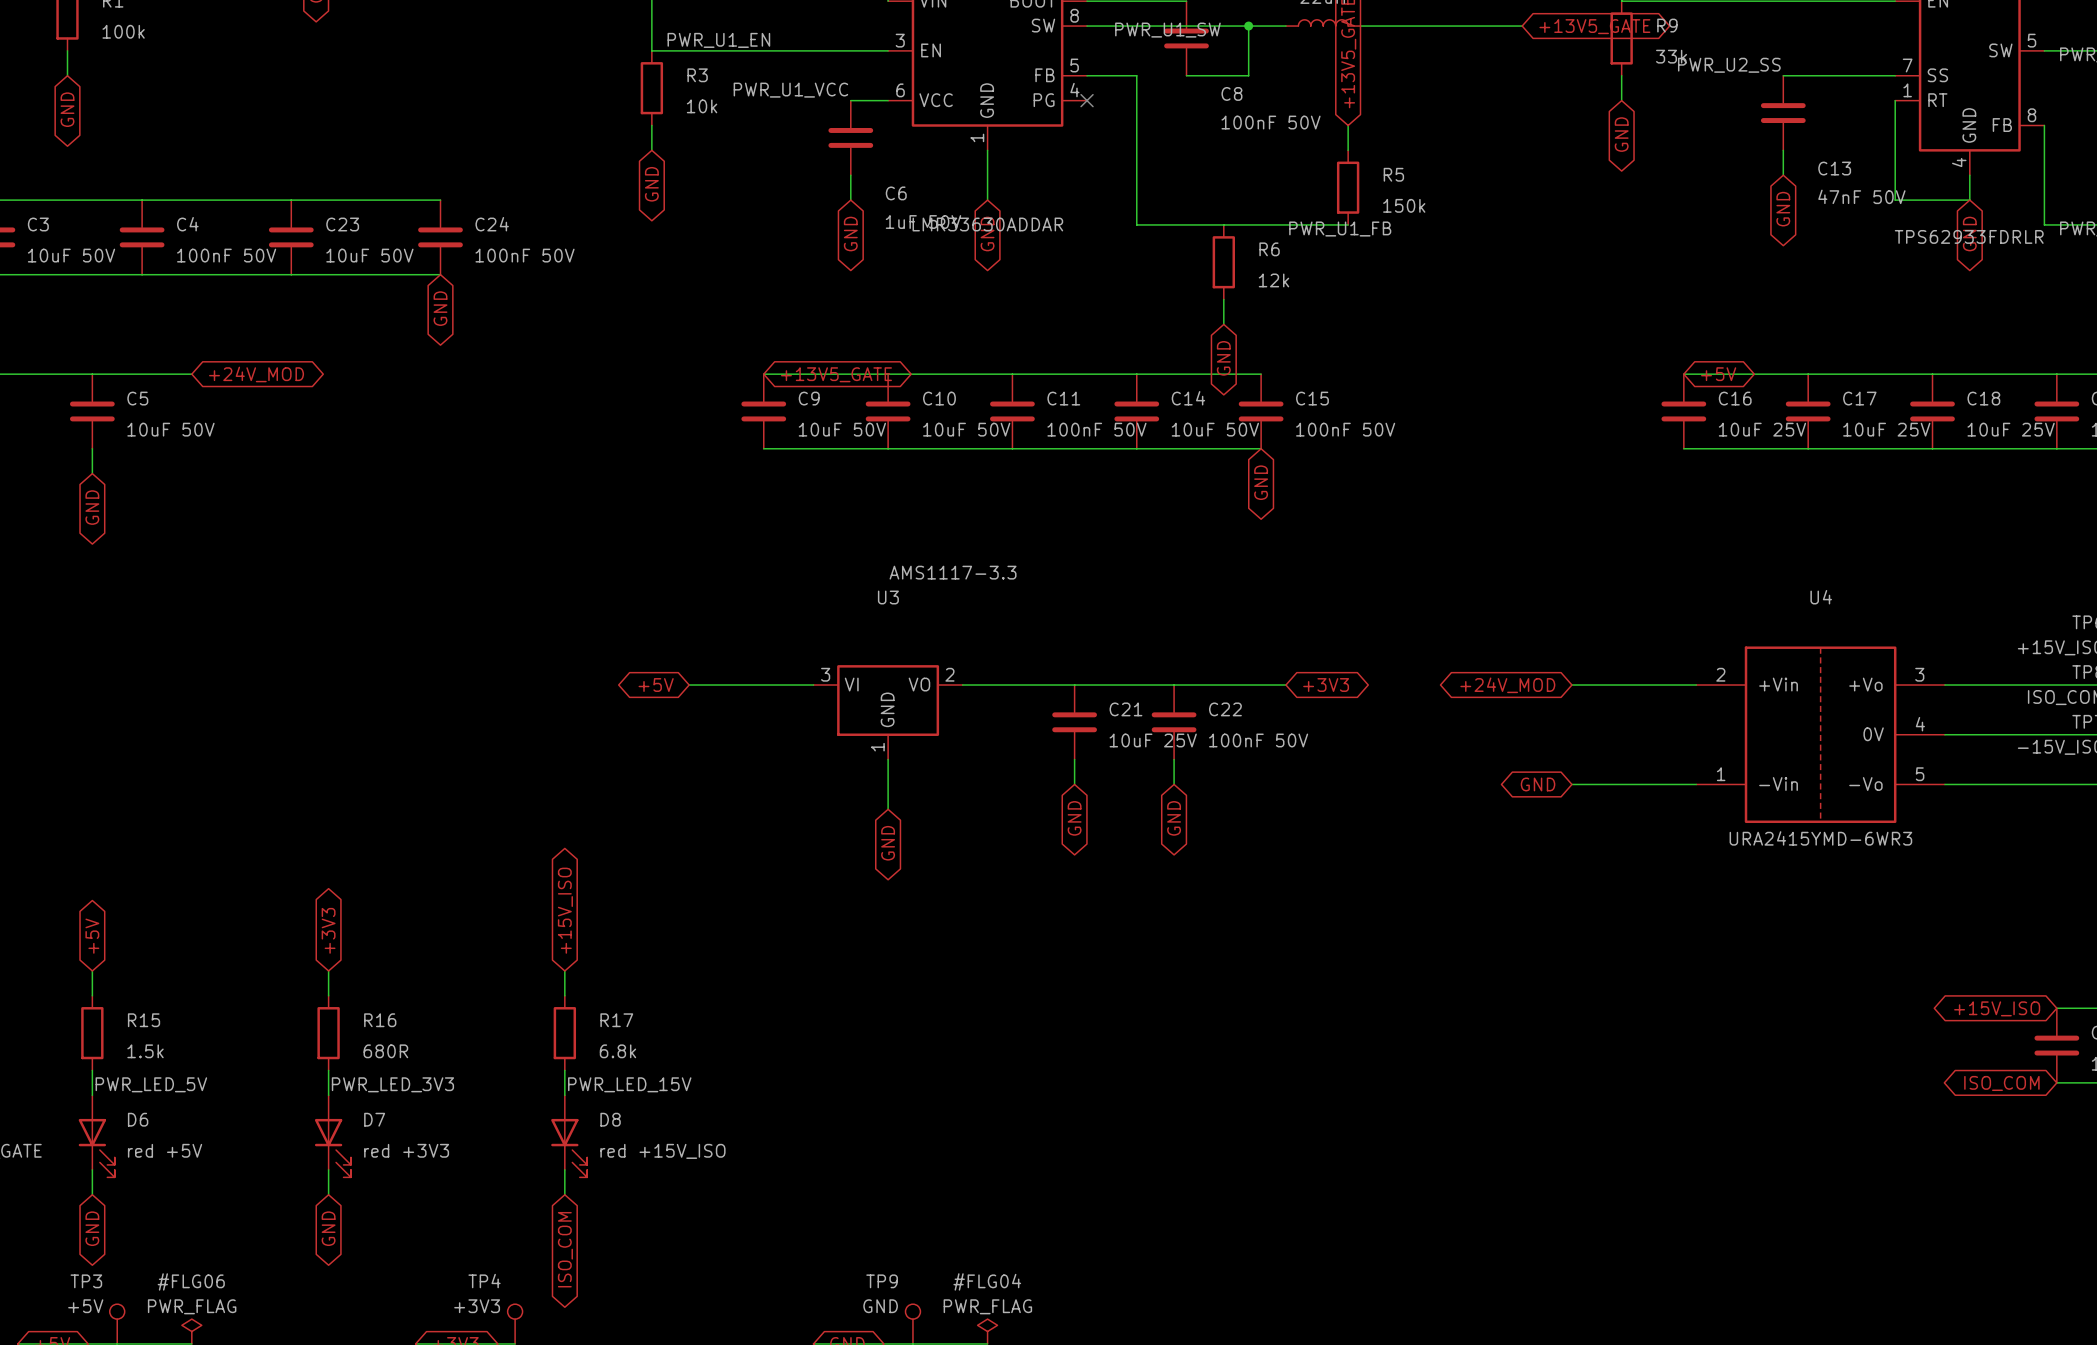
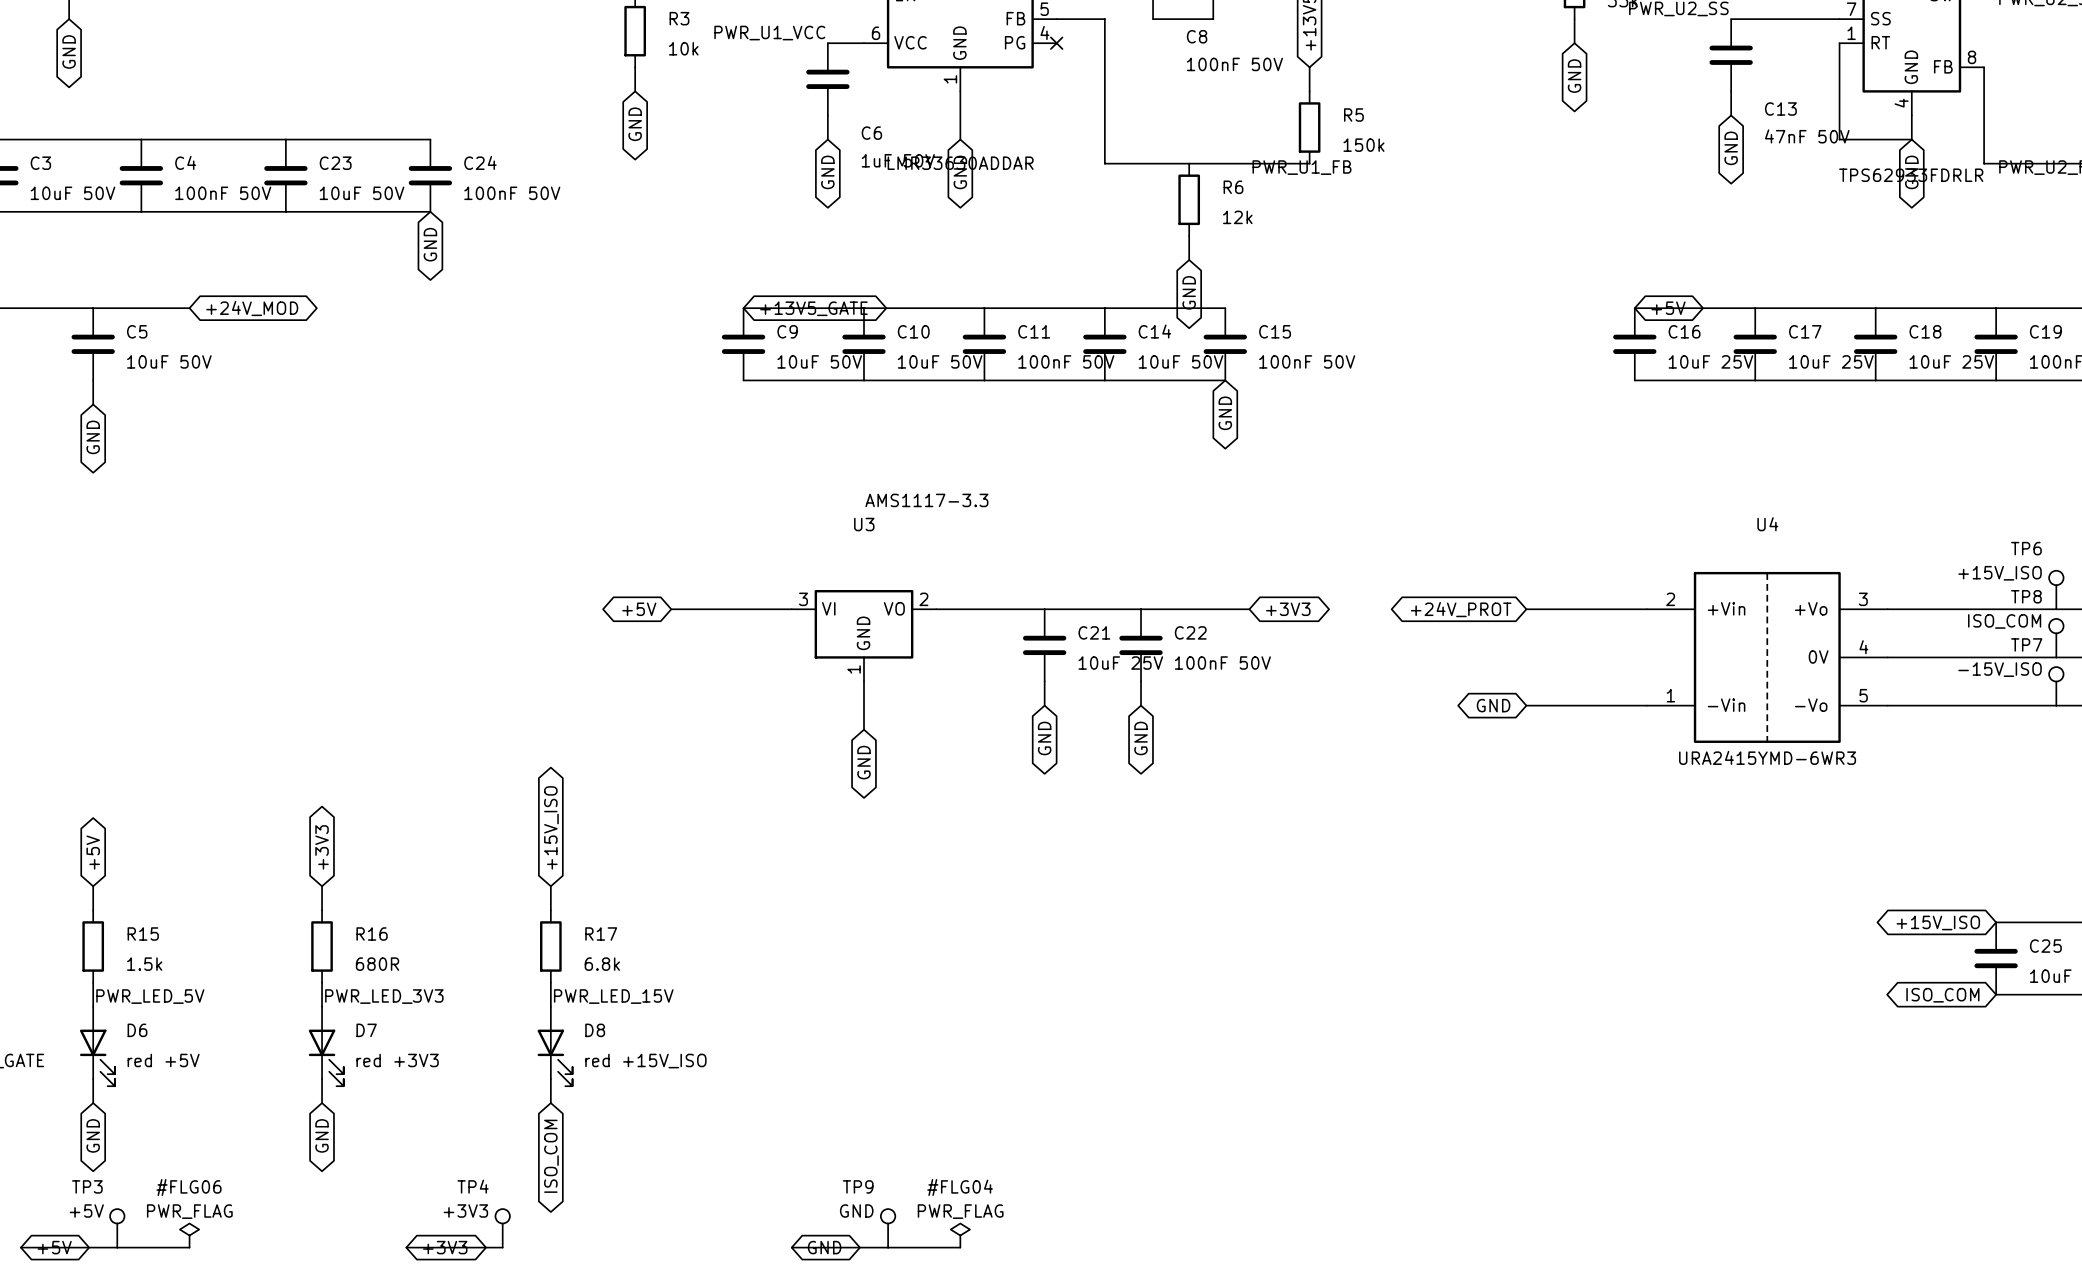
global label: +24V_MOD (1507, 685) -> +24V_PROT (1461, 609)

